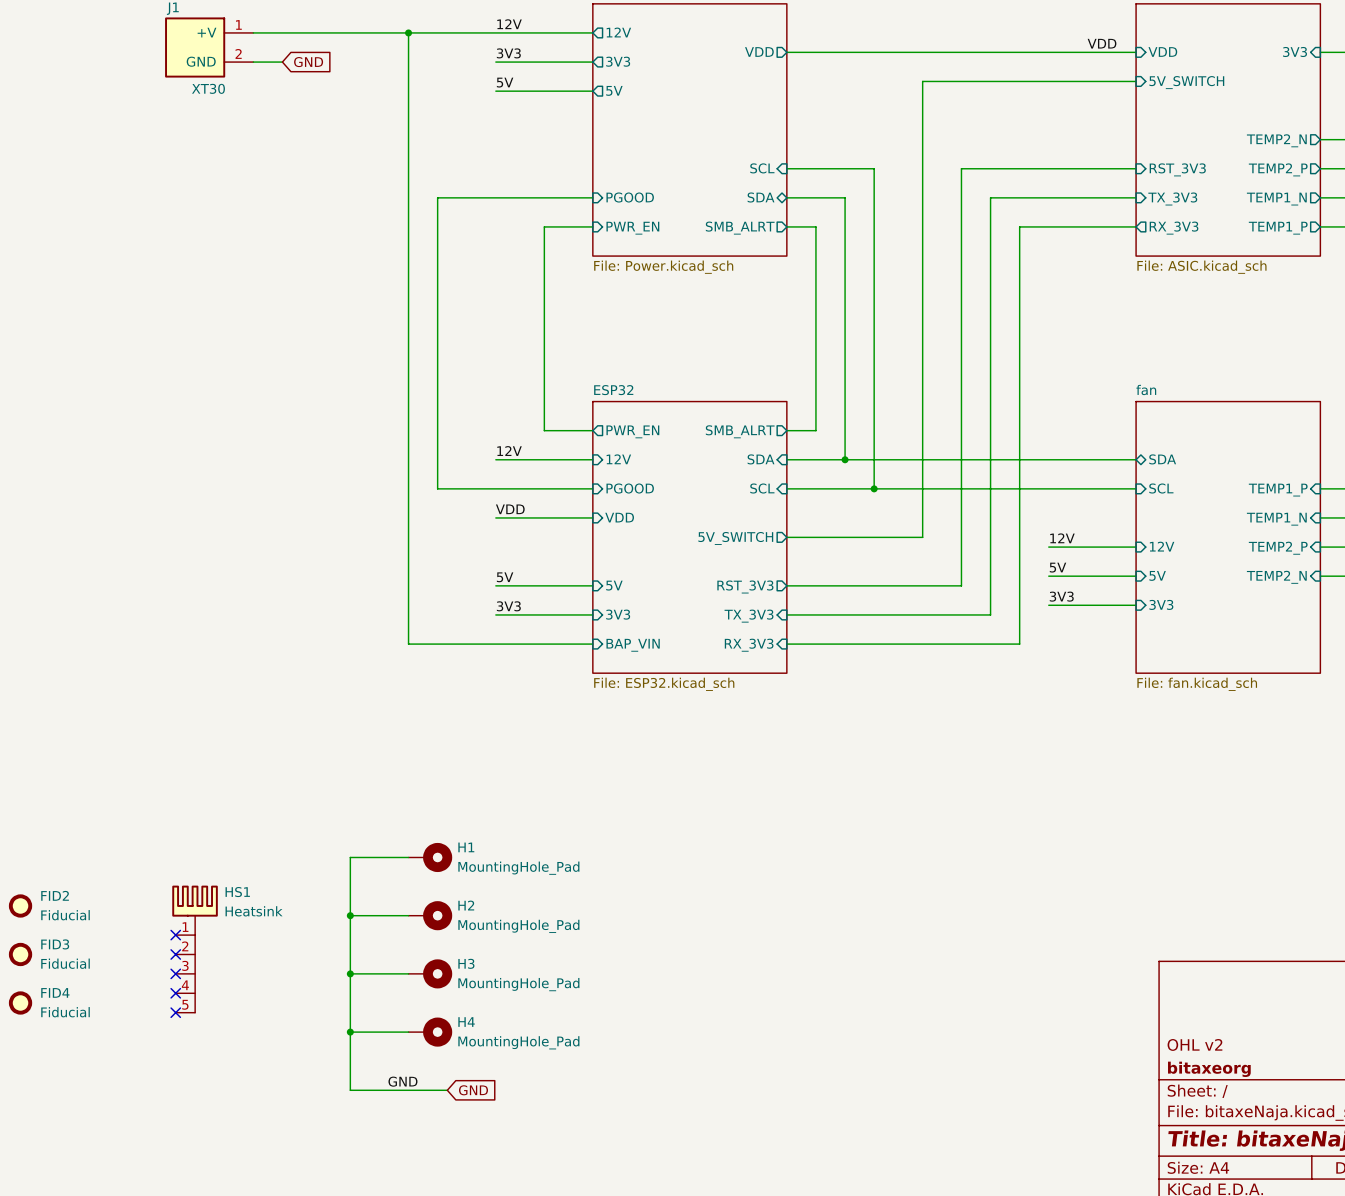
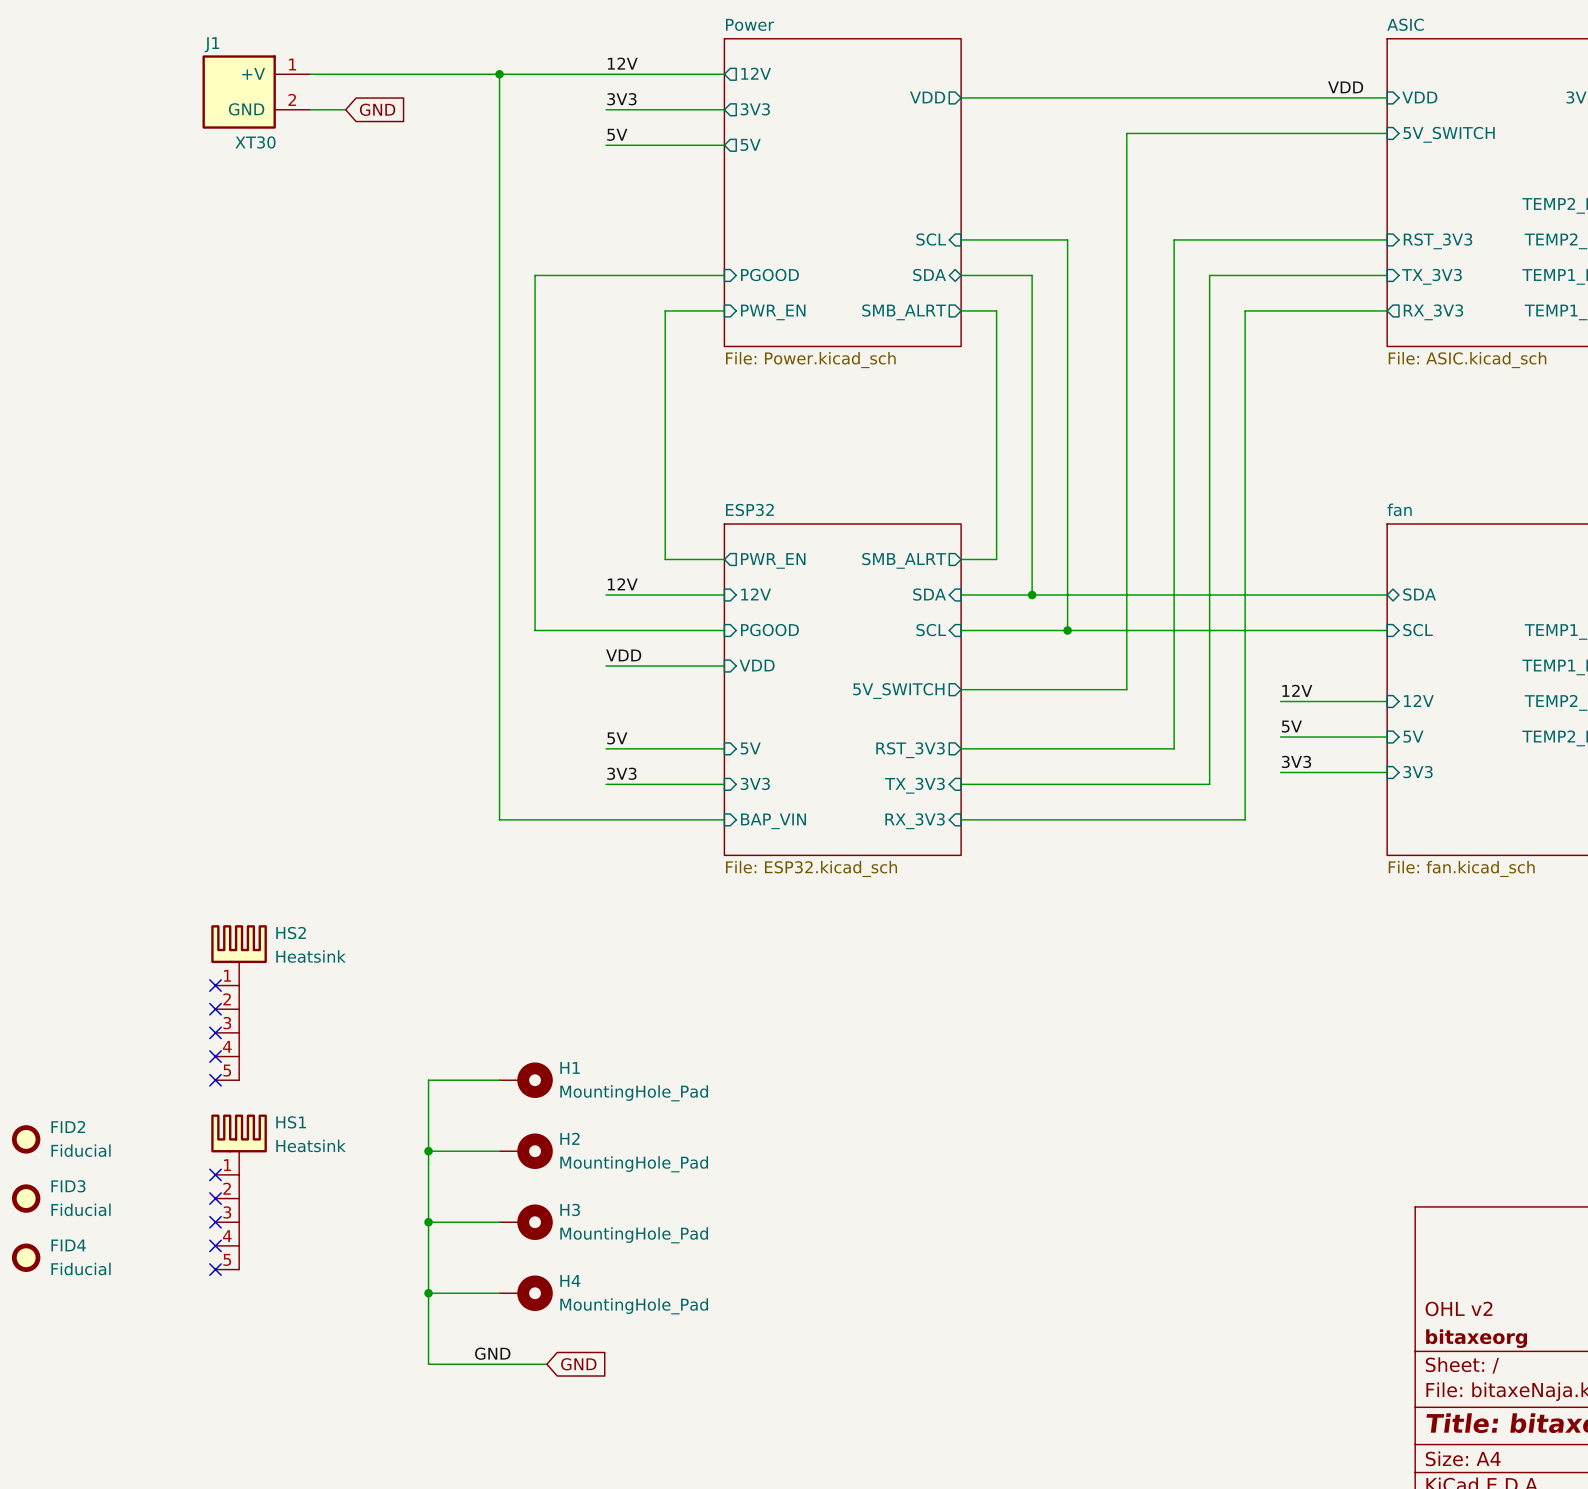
no-connect mark: none -> (215, 985)
HS2: none -> Heatsink (239, 1002)
no-connect mark: none -> (215, 1009)
no-connect mark: none -> (215, 1032)
no-connect mark: none -> (215, 1056)
no-connect mark: none -> (215, 1080)

